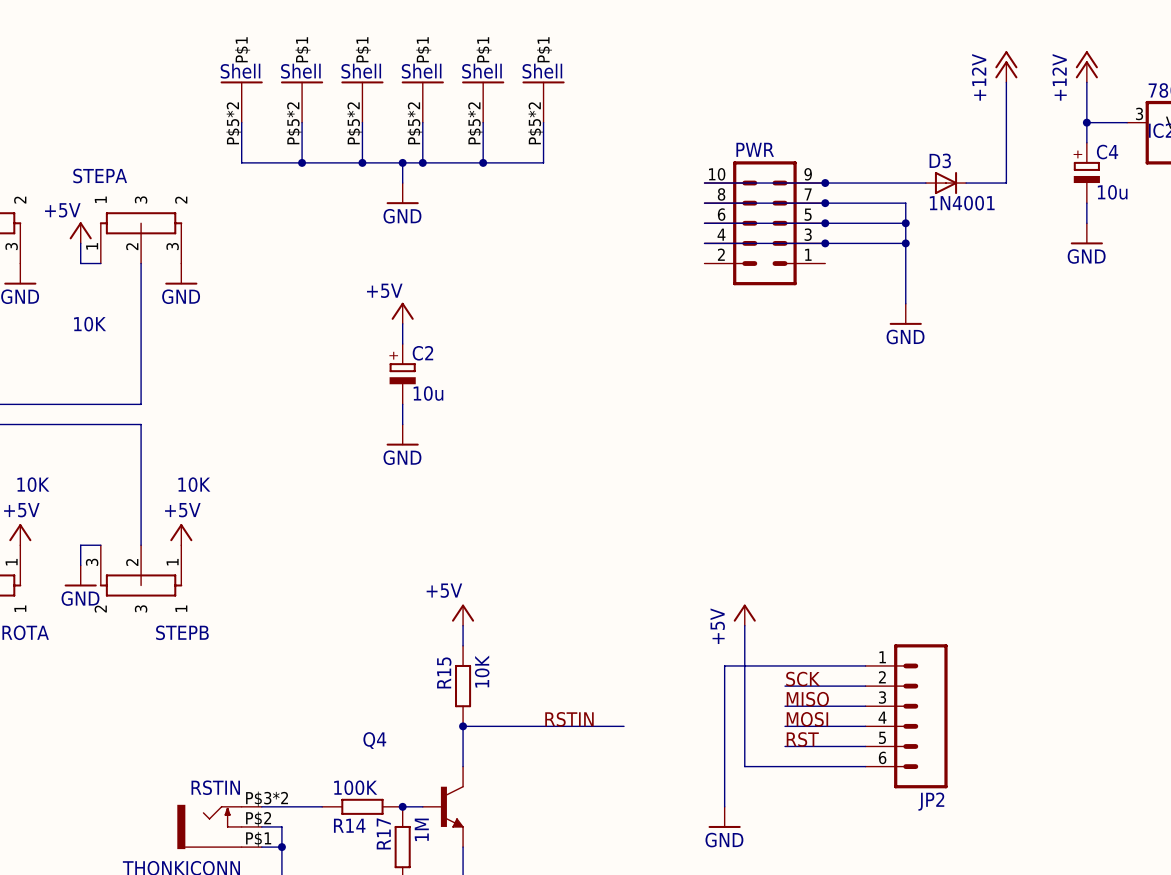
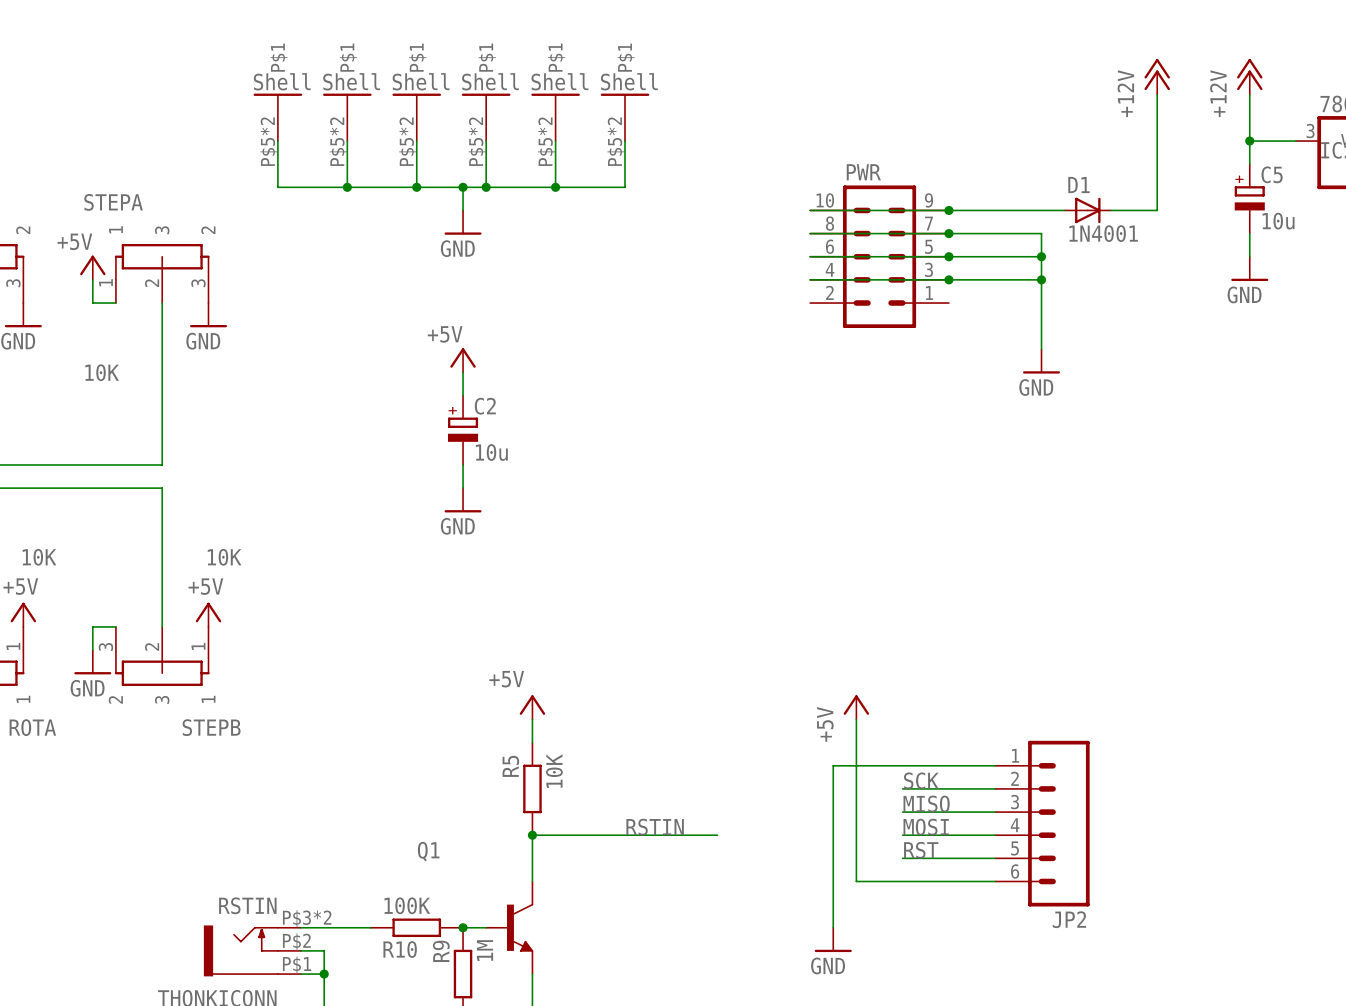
C4 name: C4 (1107, 152) -> C5 (1272, 174)
D3 name: D3 (940, 160) -> D1 (1078, 185)
R15 name: R15 (444, 672) -> R5 (510, 766)
Q4 name: Q4 (374, 740) -> Q1 (428, 851)
R14 name: R14 (349, 825) -> R10 (400, 949)
R17 name: R17 (383, 833) -> R9 (441, 951)

